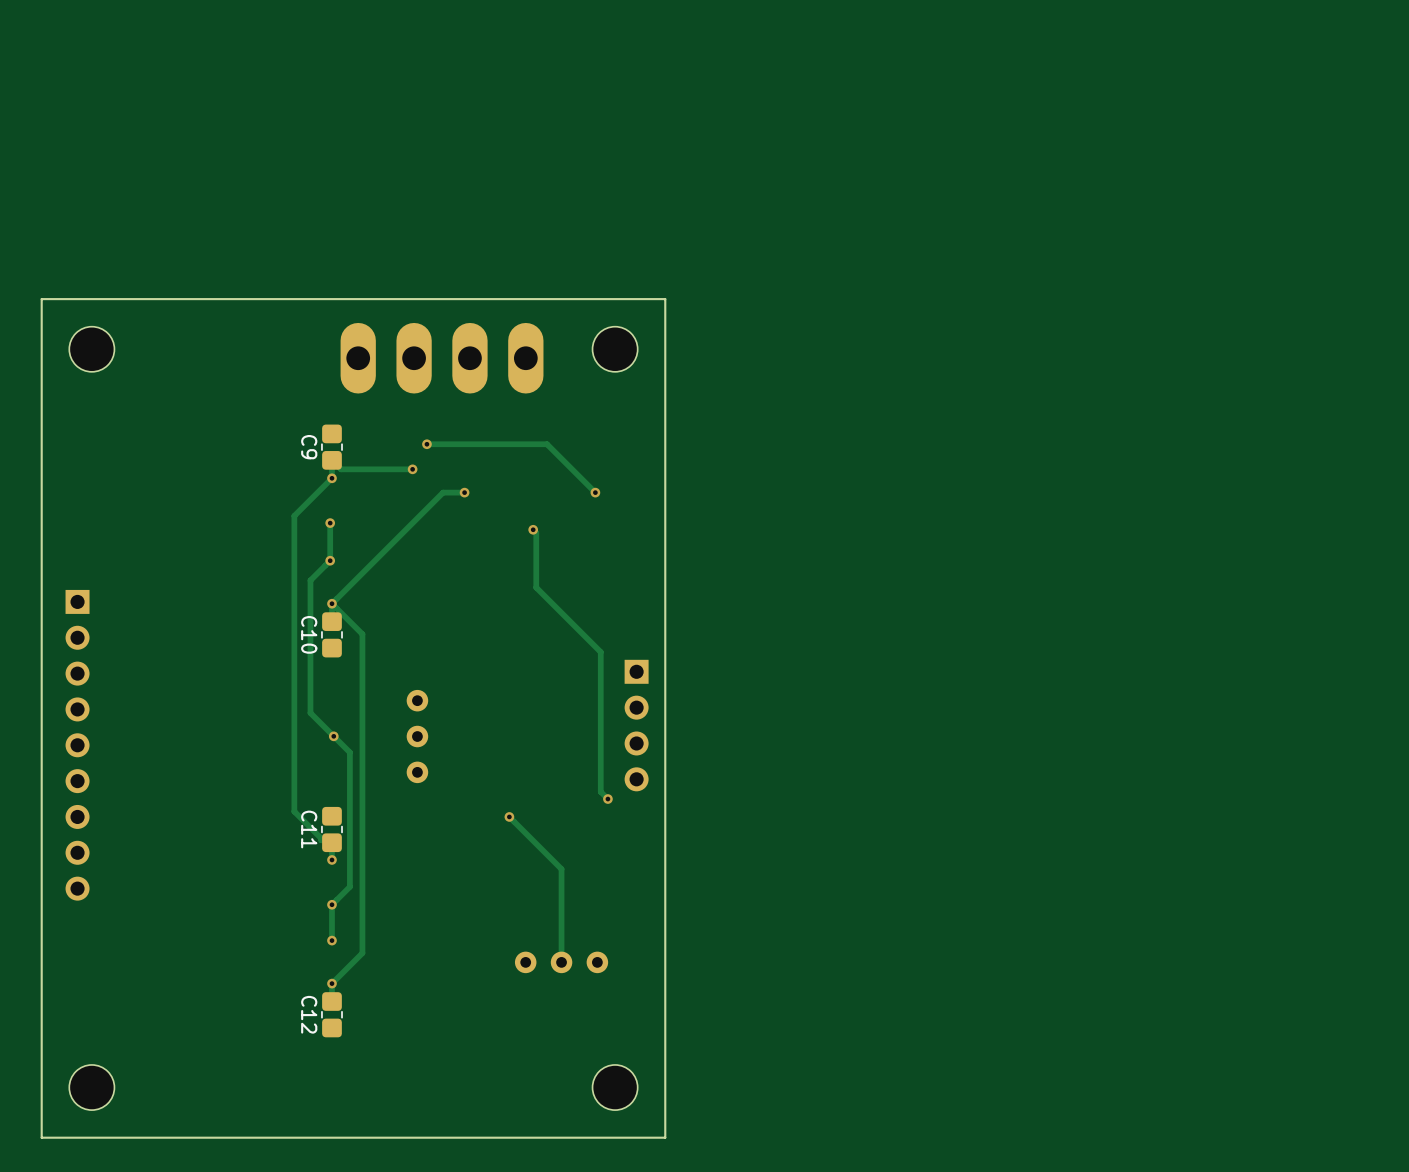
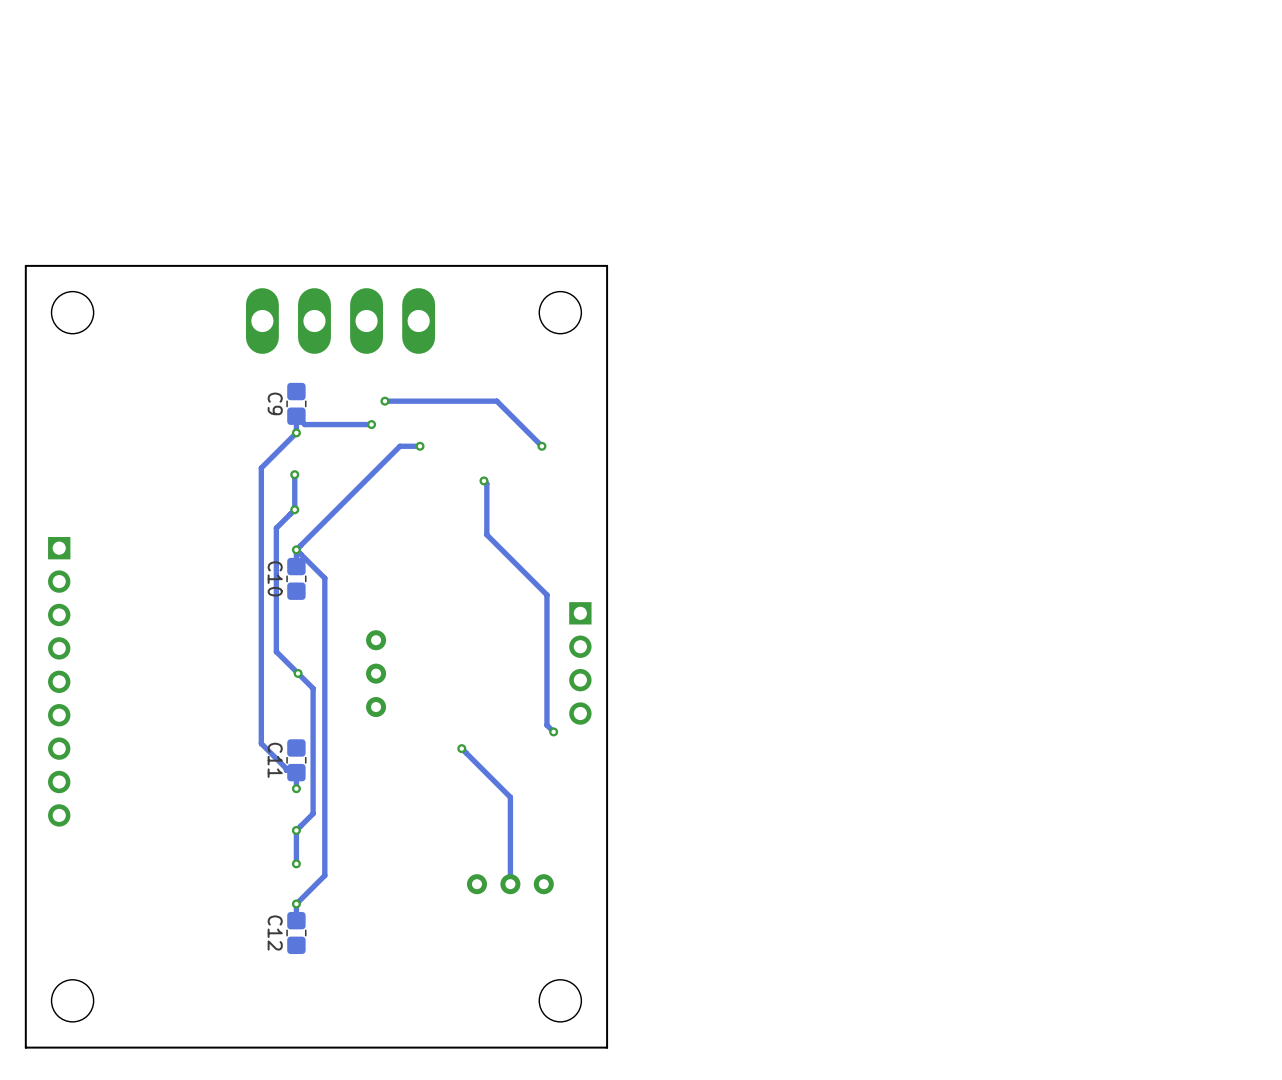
part position: (442, 358) -> (340, 321)

